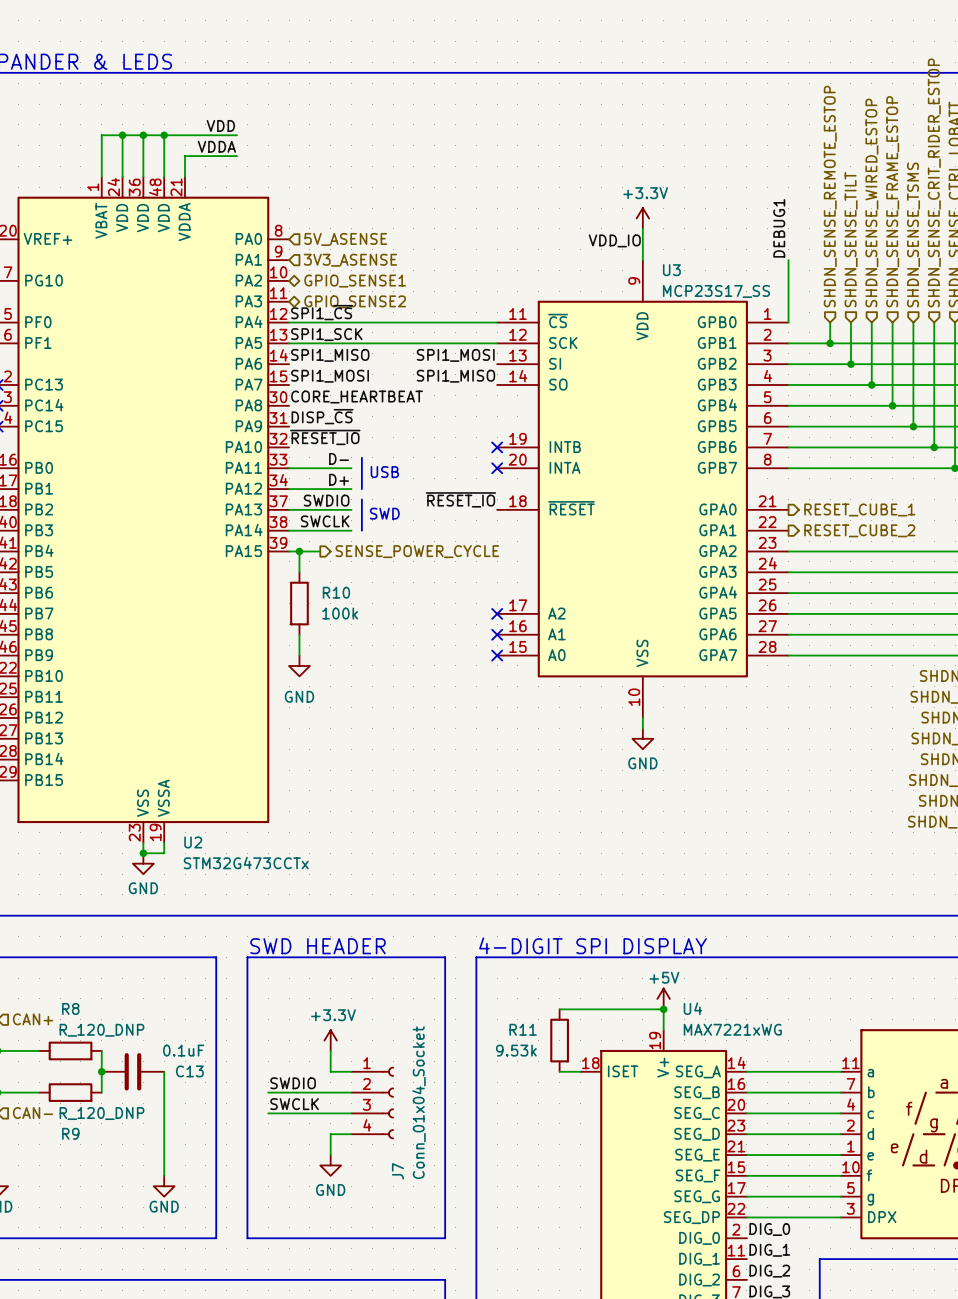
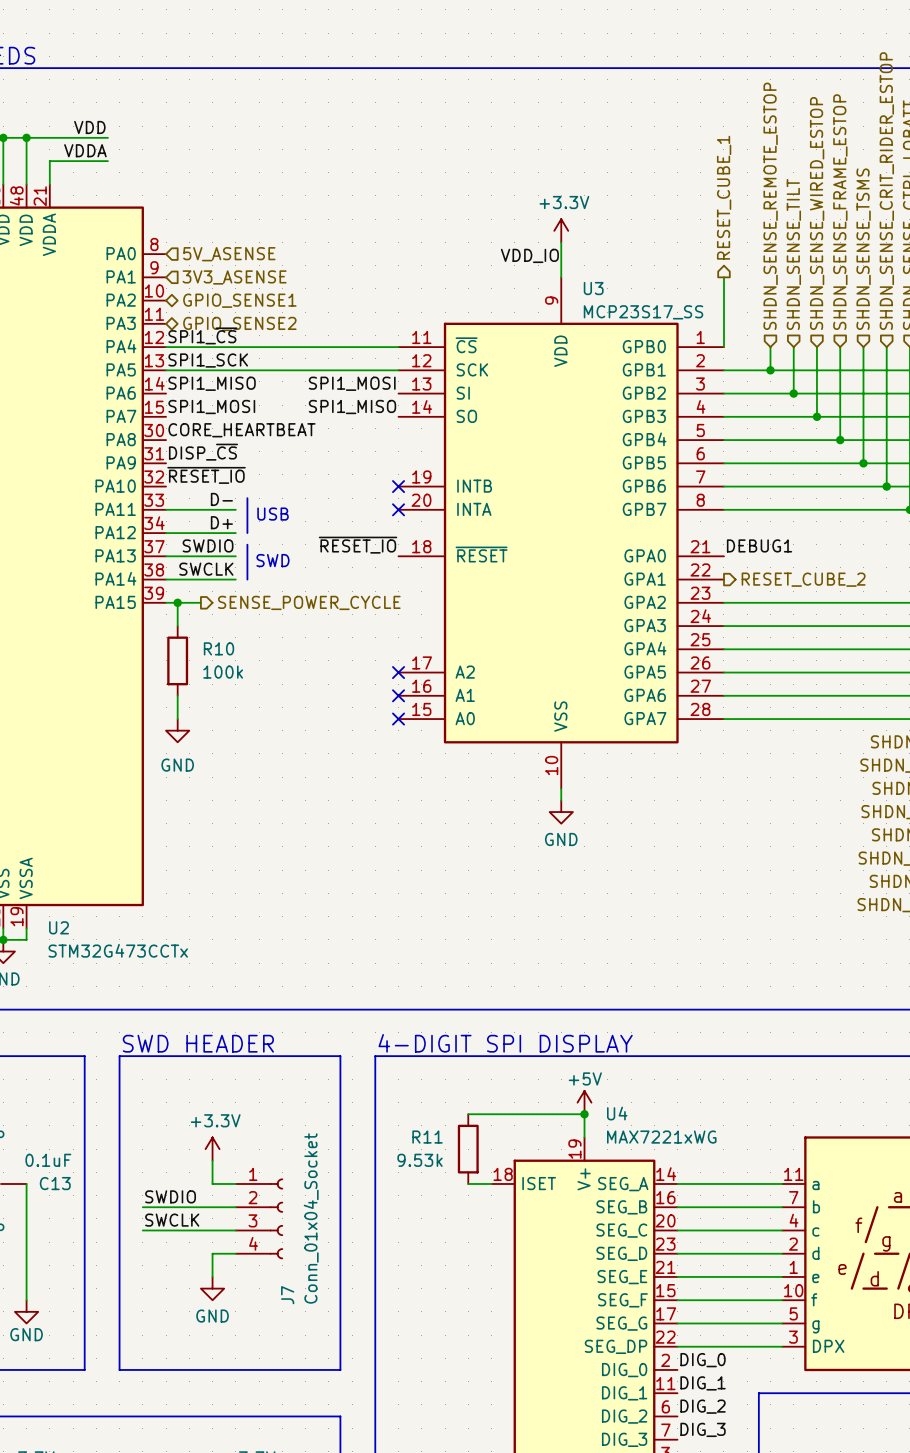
hierarchical label: none -> RESET_CUBE_1 (724, 197)
label: DEBUG1 (779, 228) -> none
label: none -> DEBUG1 (759, 545)
hierarchical label: RESET_CUBE_1 (859, 509) -> none

